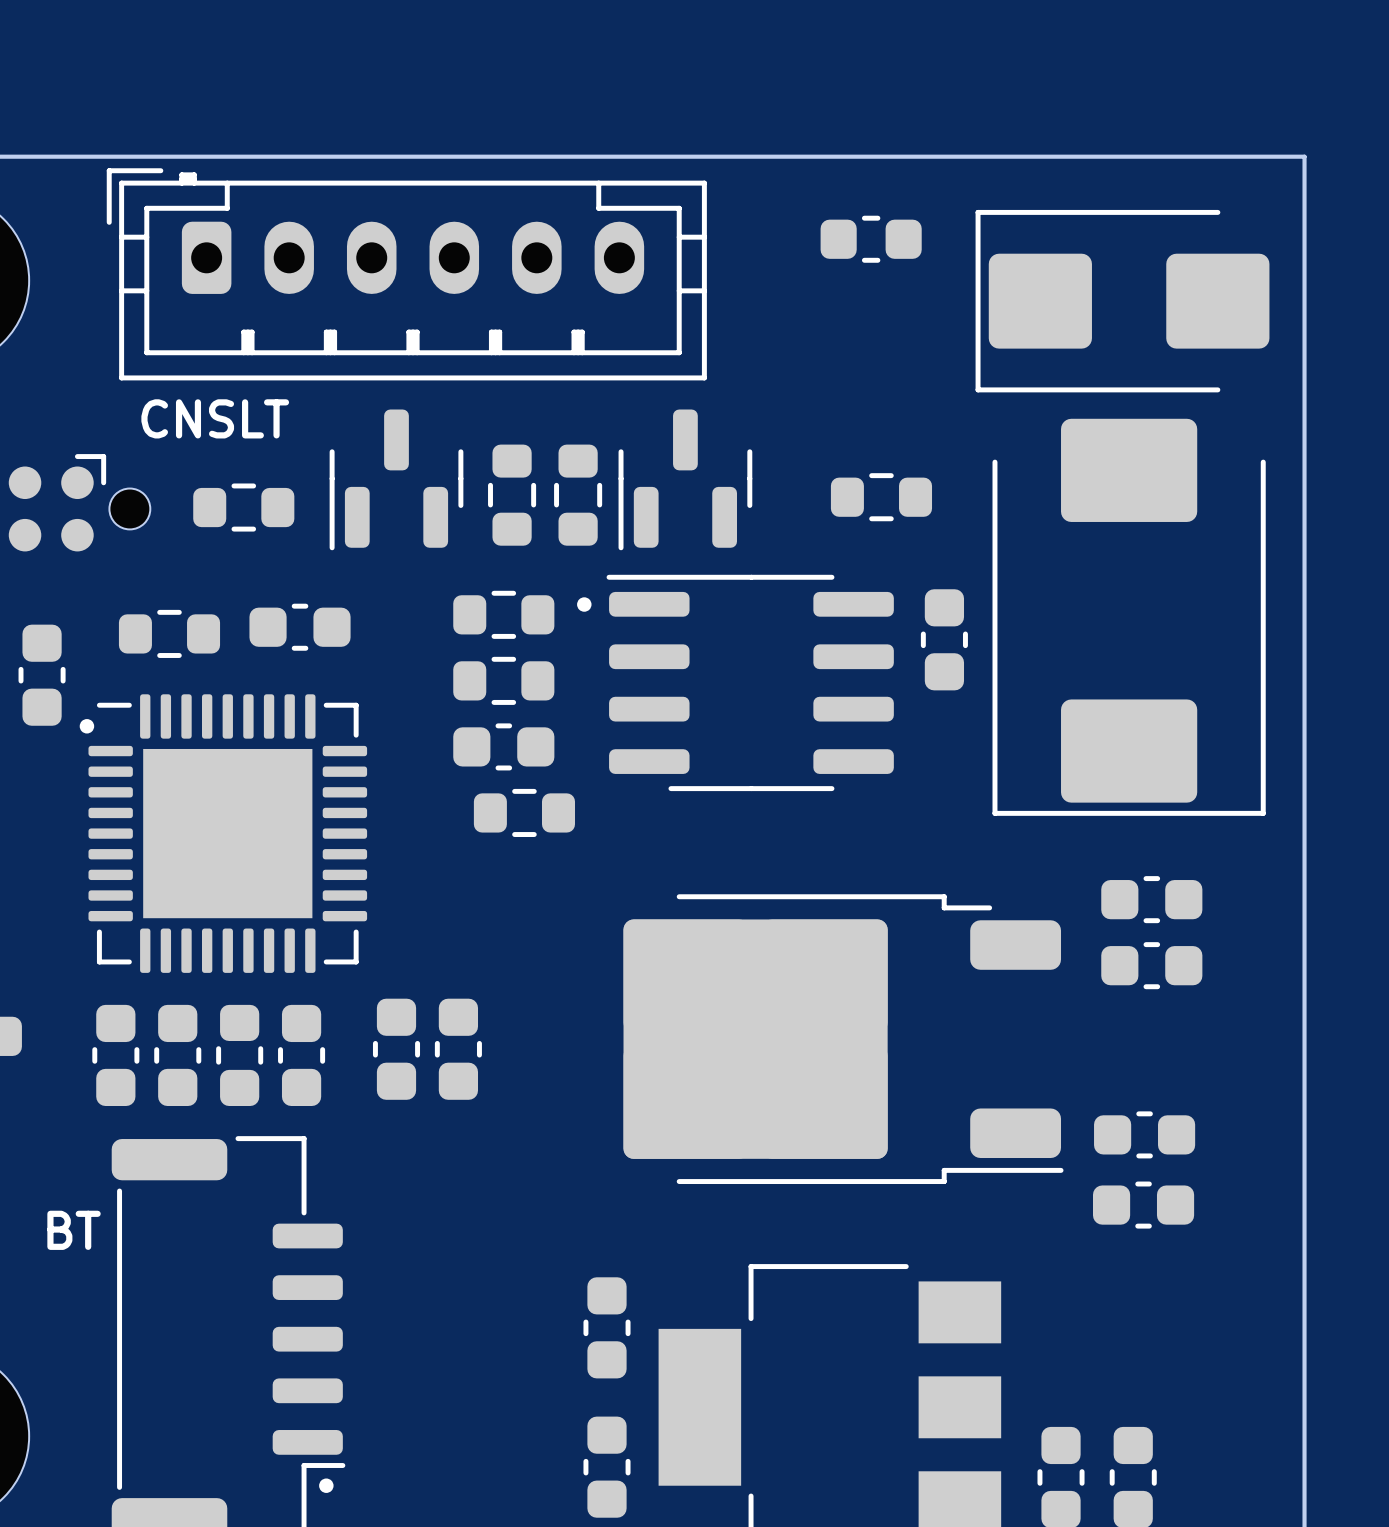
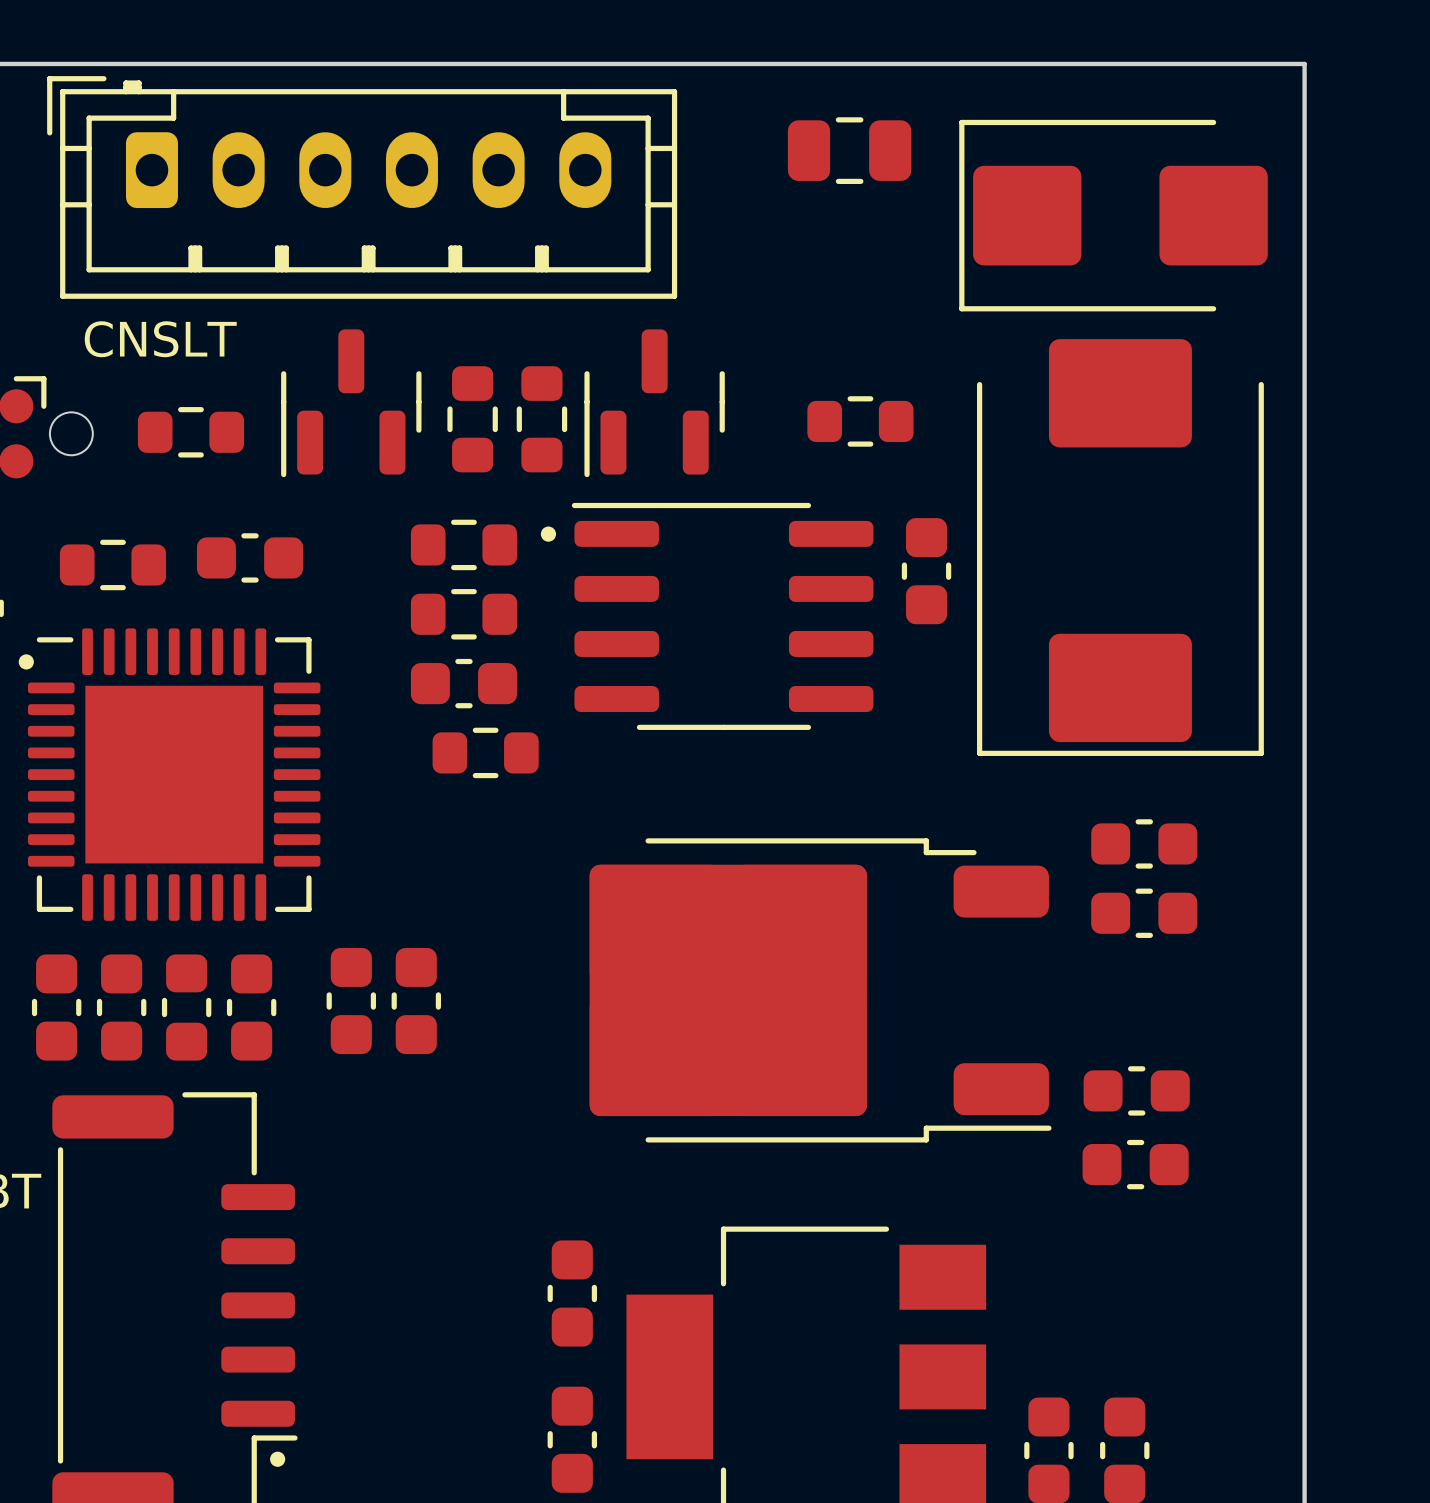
part footprint: [820, 215, 922, 263] -> [787, 117, 912, 184]

